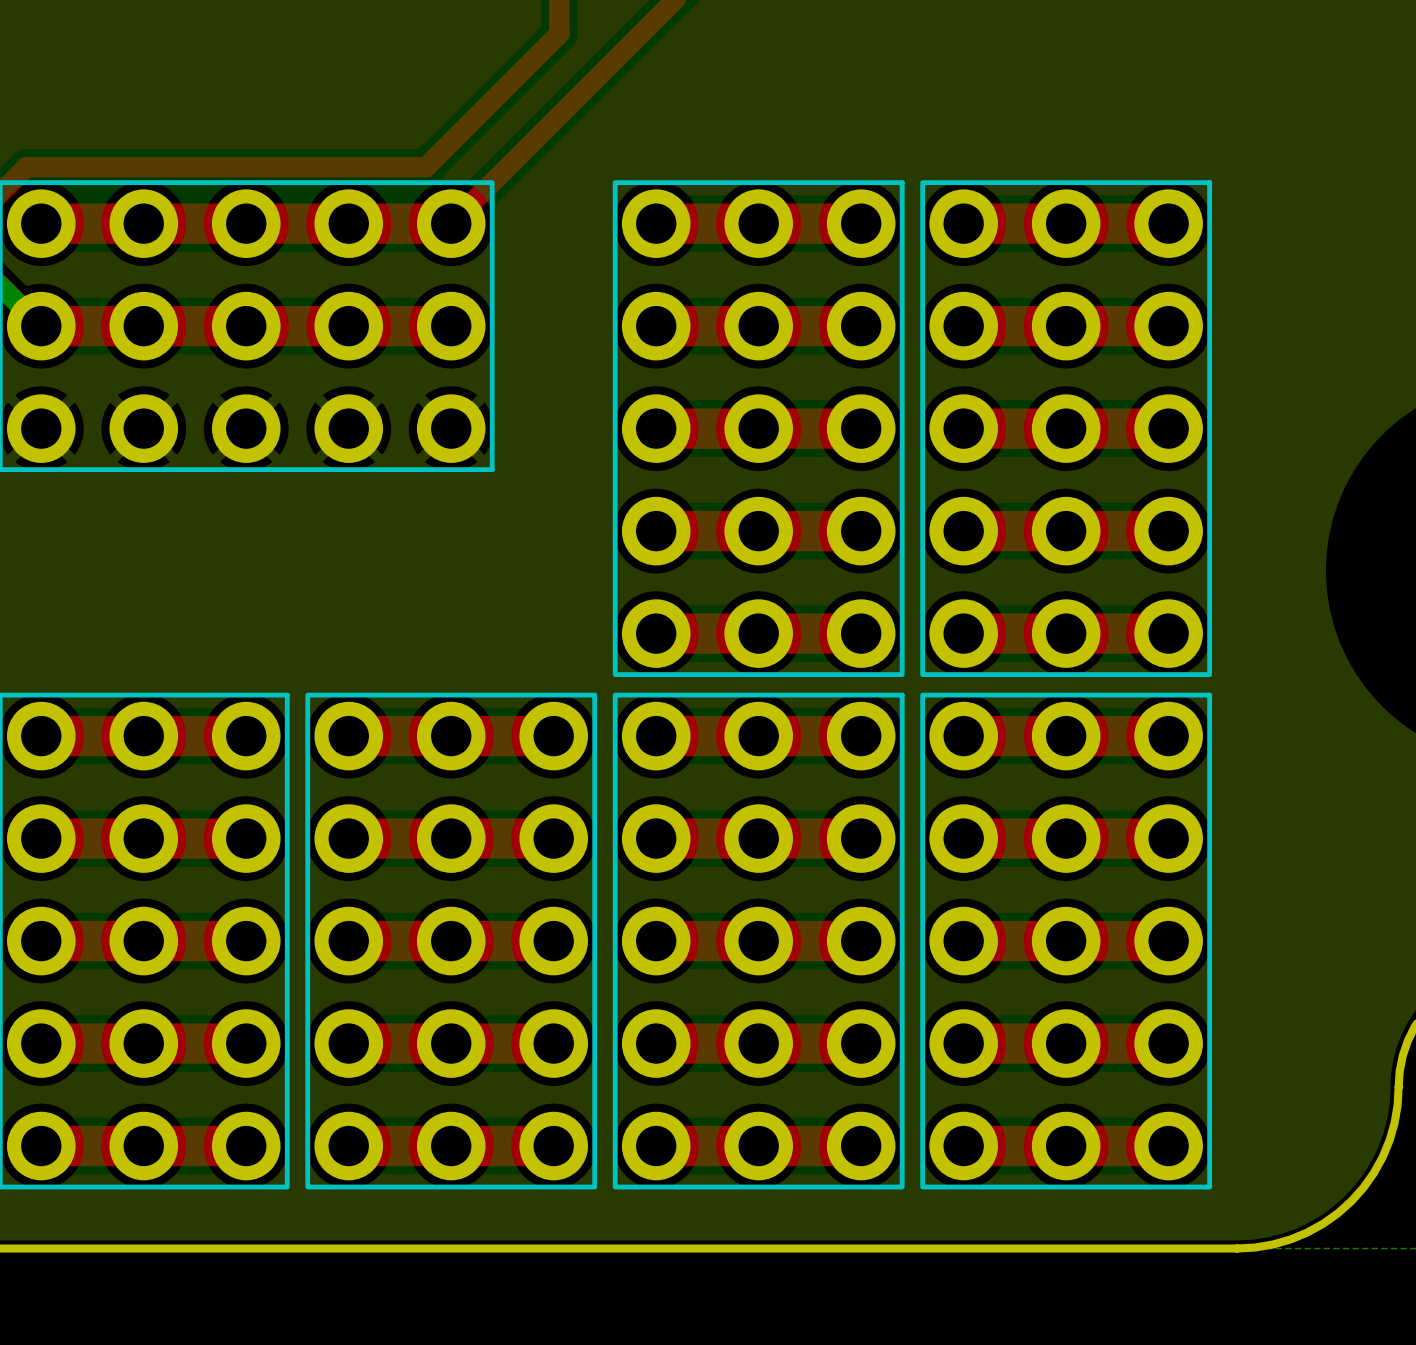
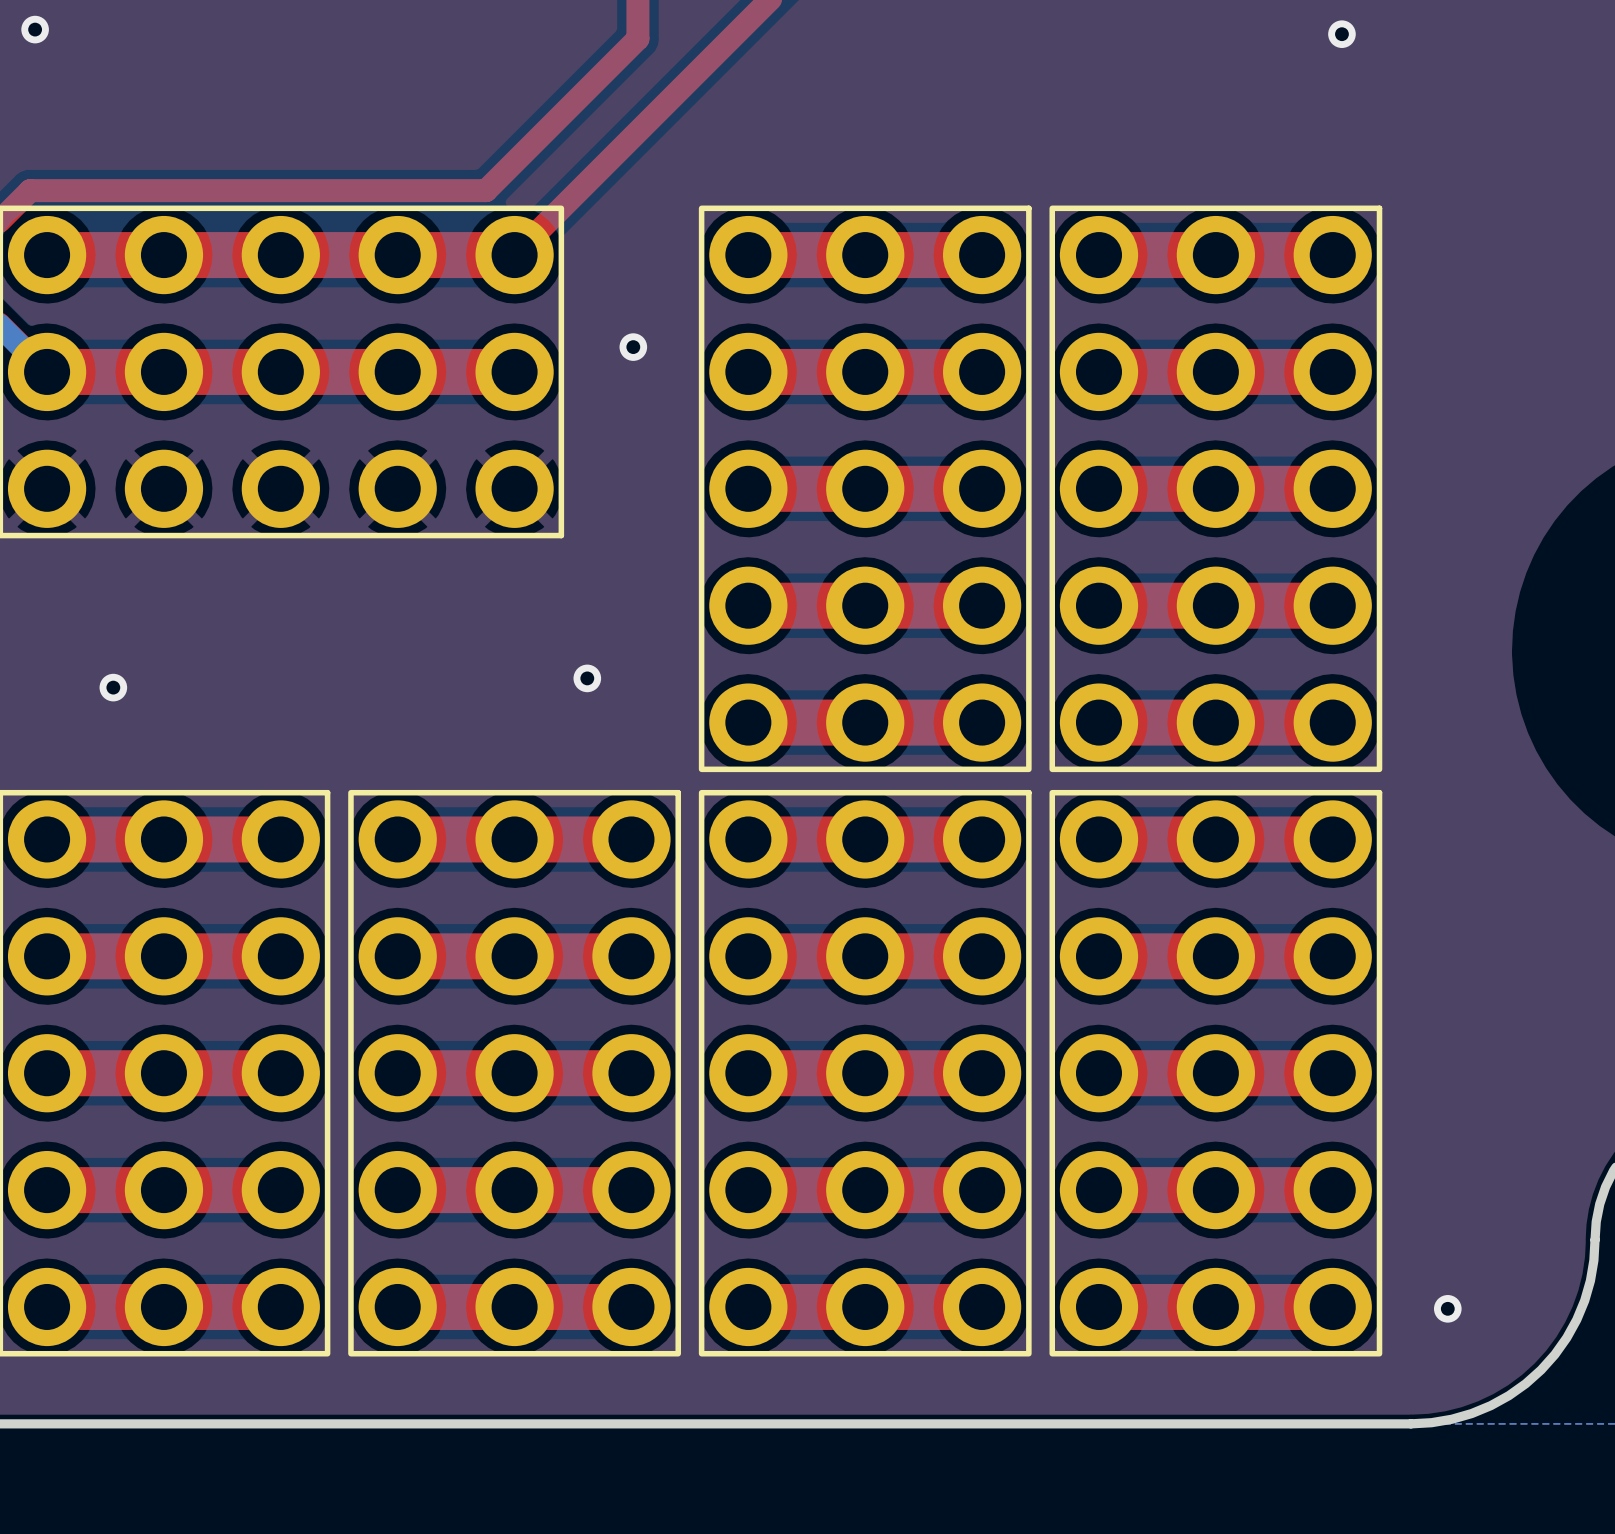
via: none -> (35, 29)
via: none -> (1341, 34)
via: none -> (633, 347)
via: none -> (587, 678)
via: none -> (113, 687)
via: none -> (1447, 1308)

